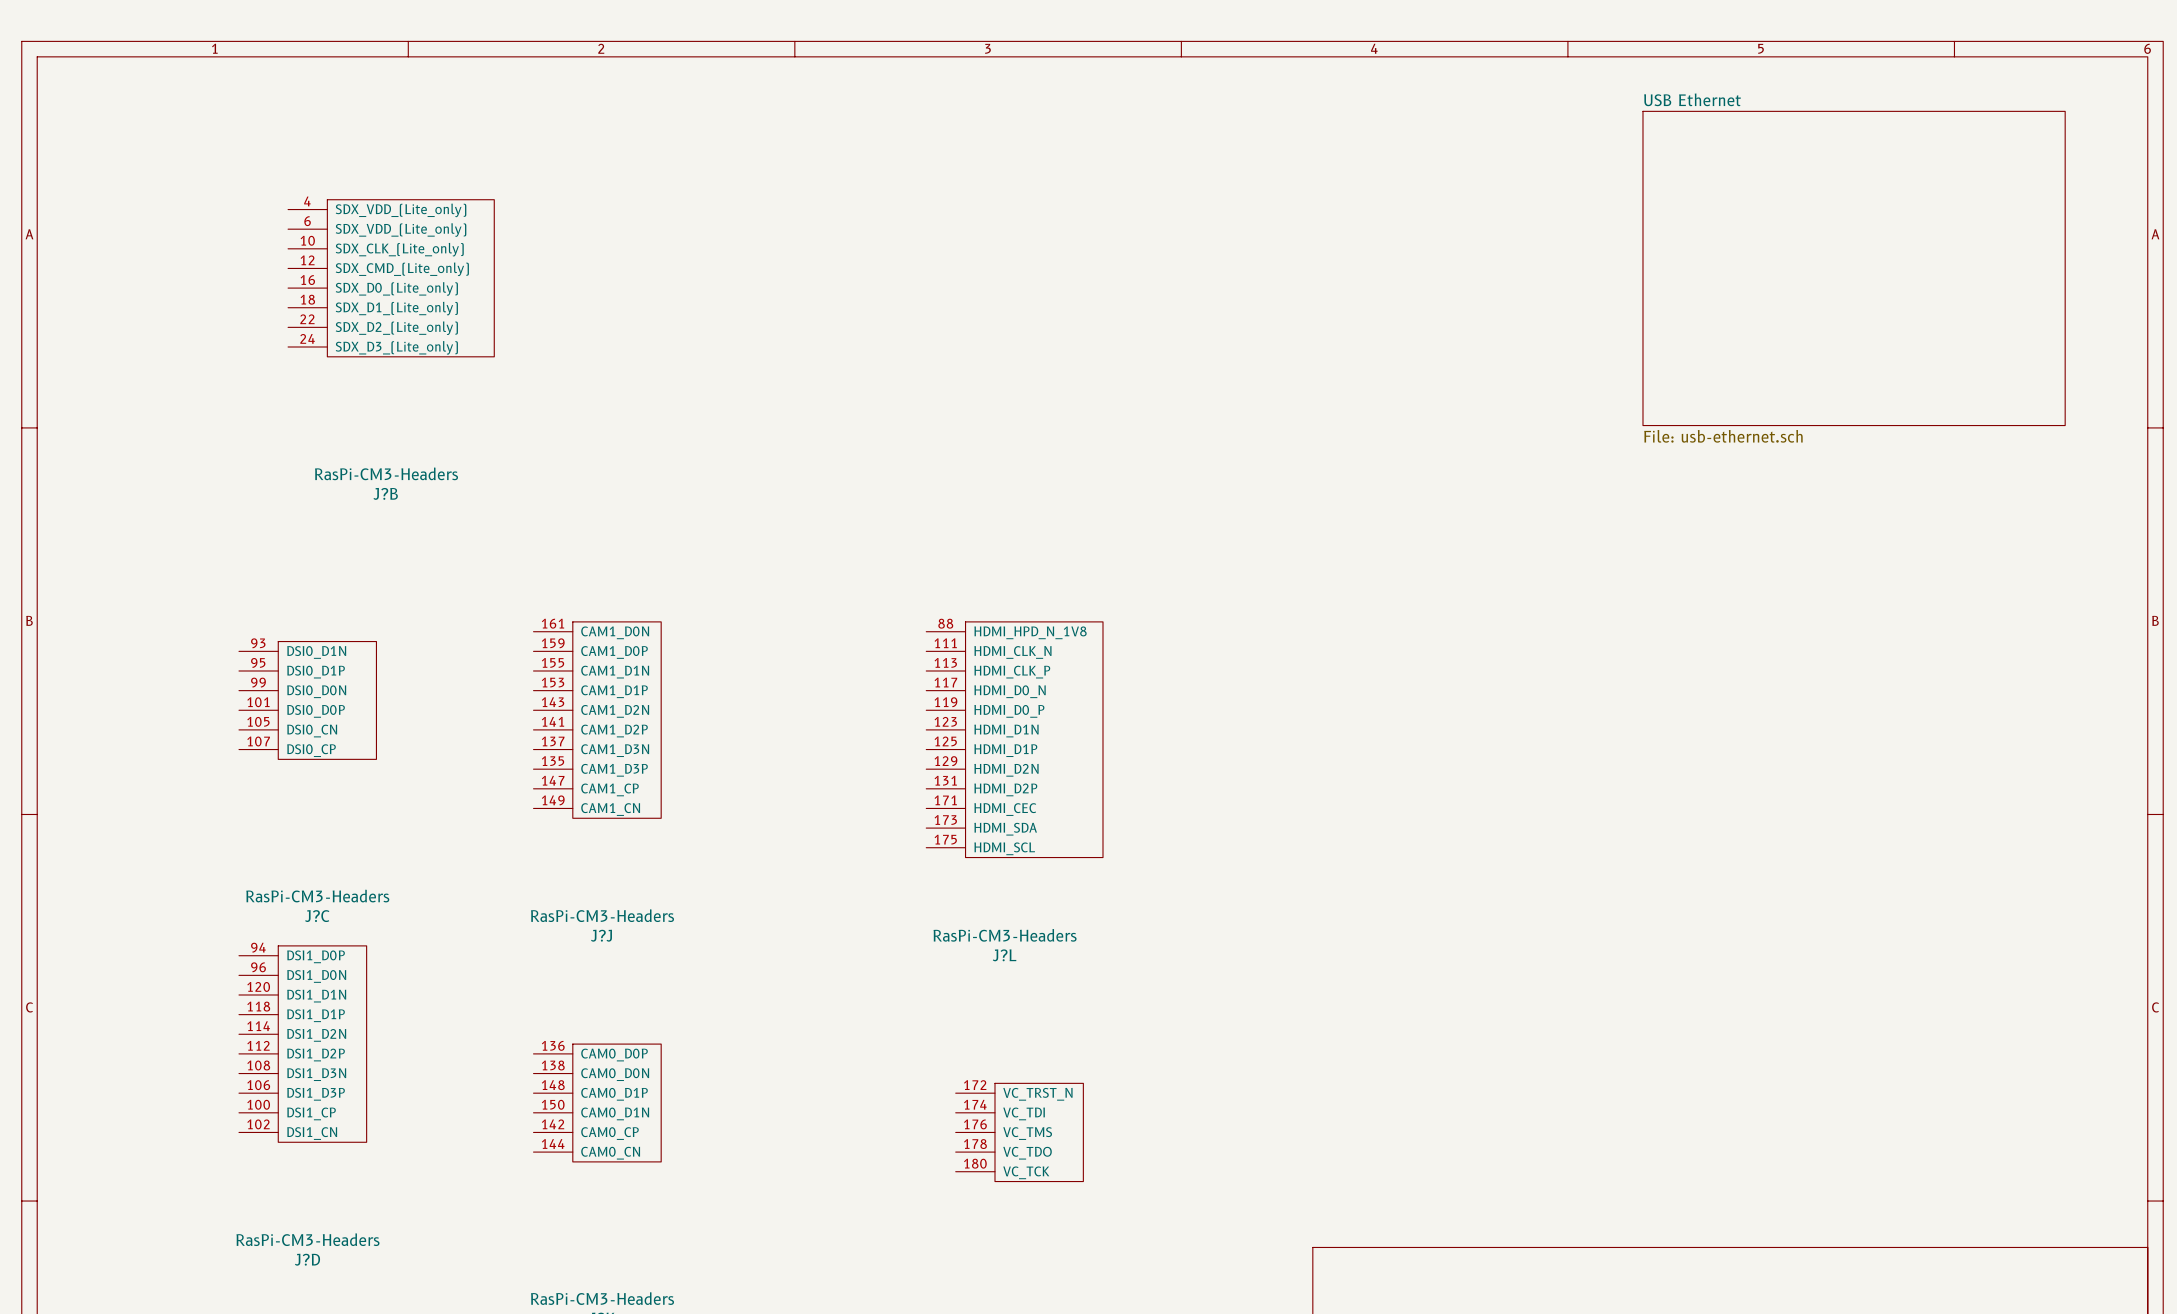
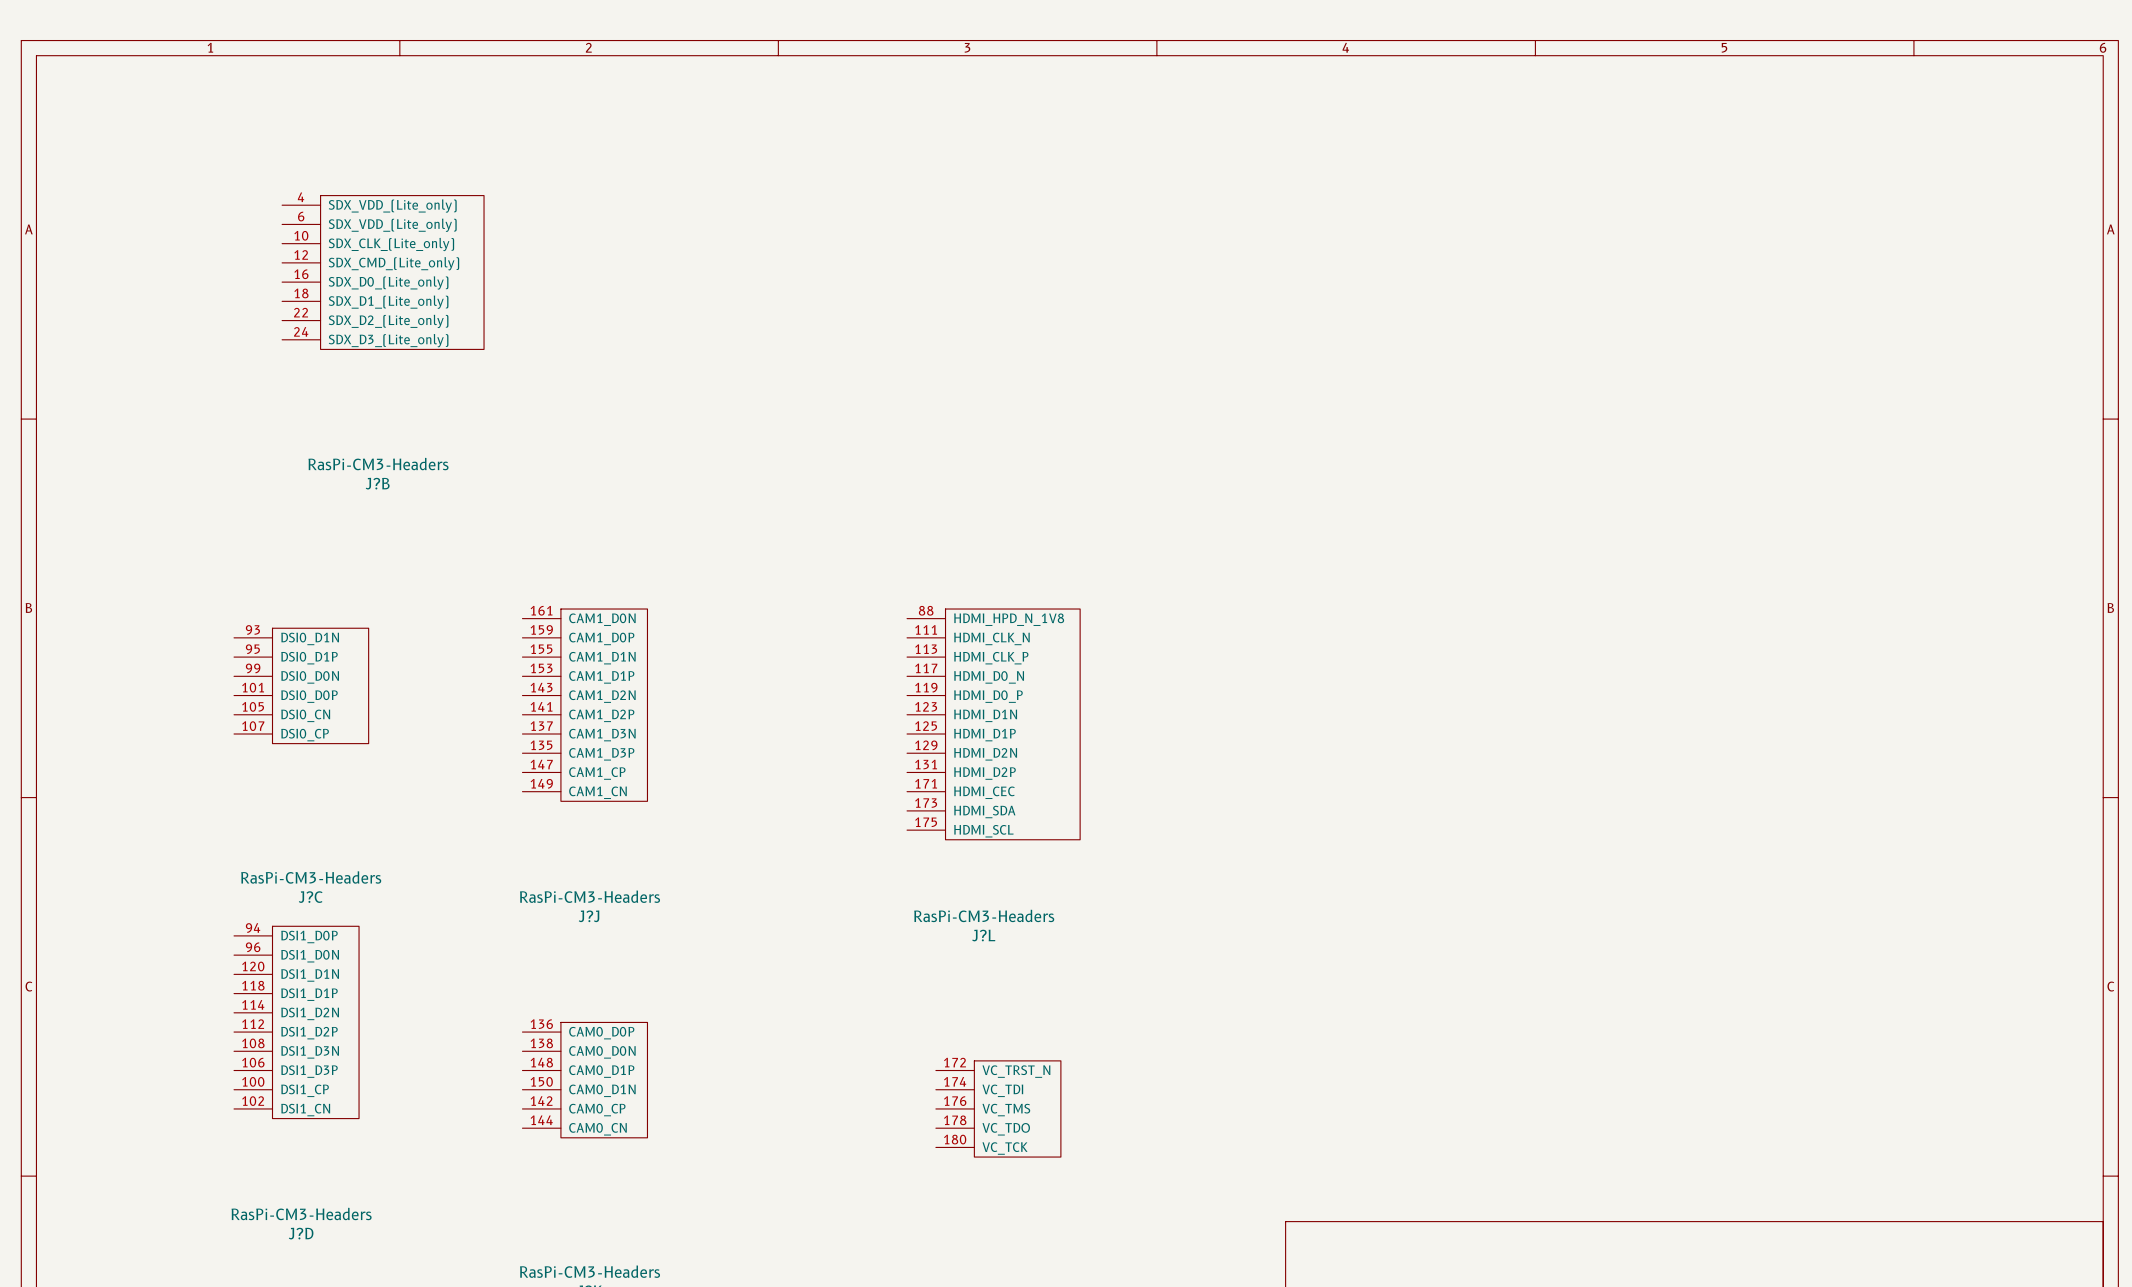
sheet USB Ethernet: File: usb-ethernet.sch (1854, 268) -> none

